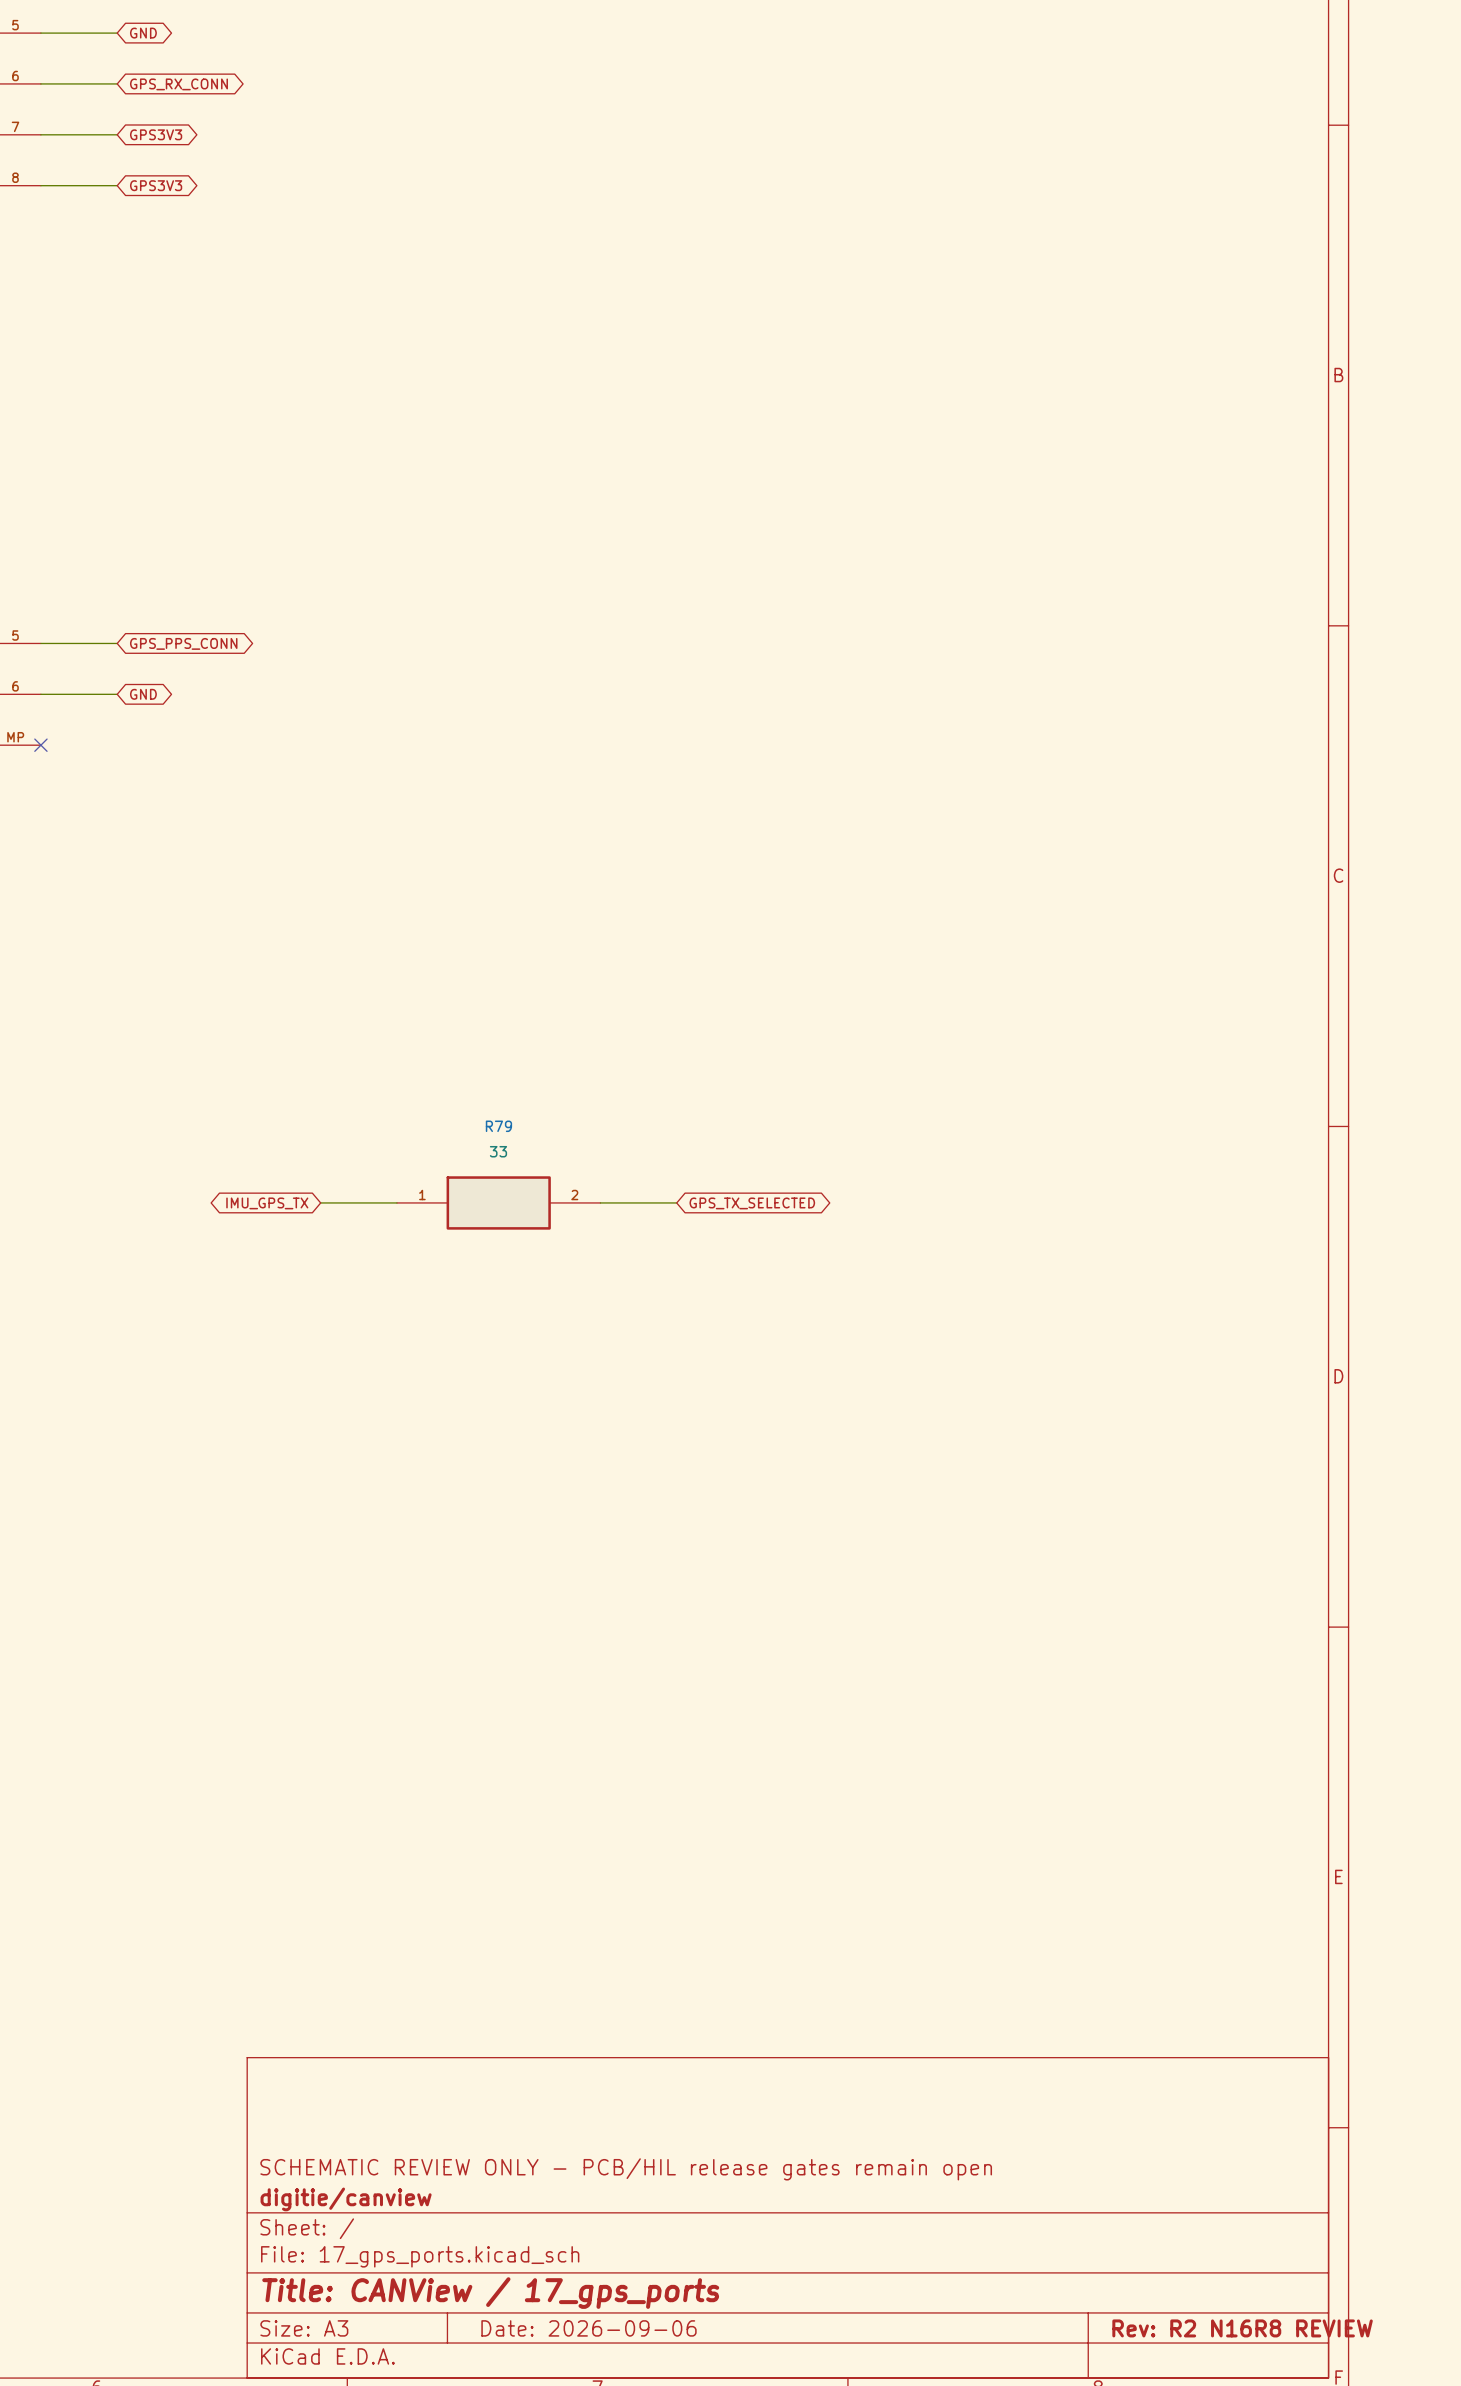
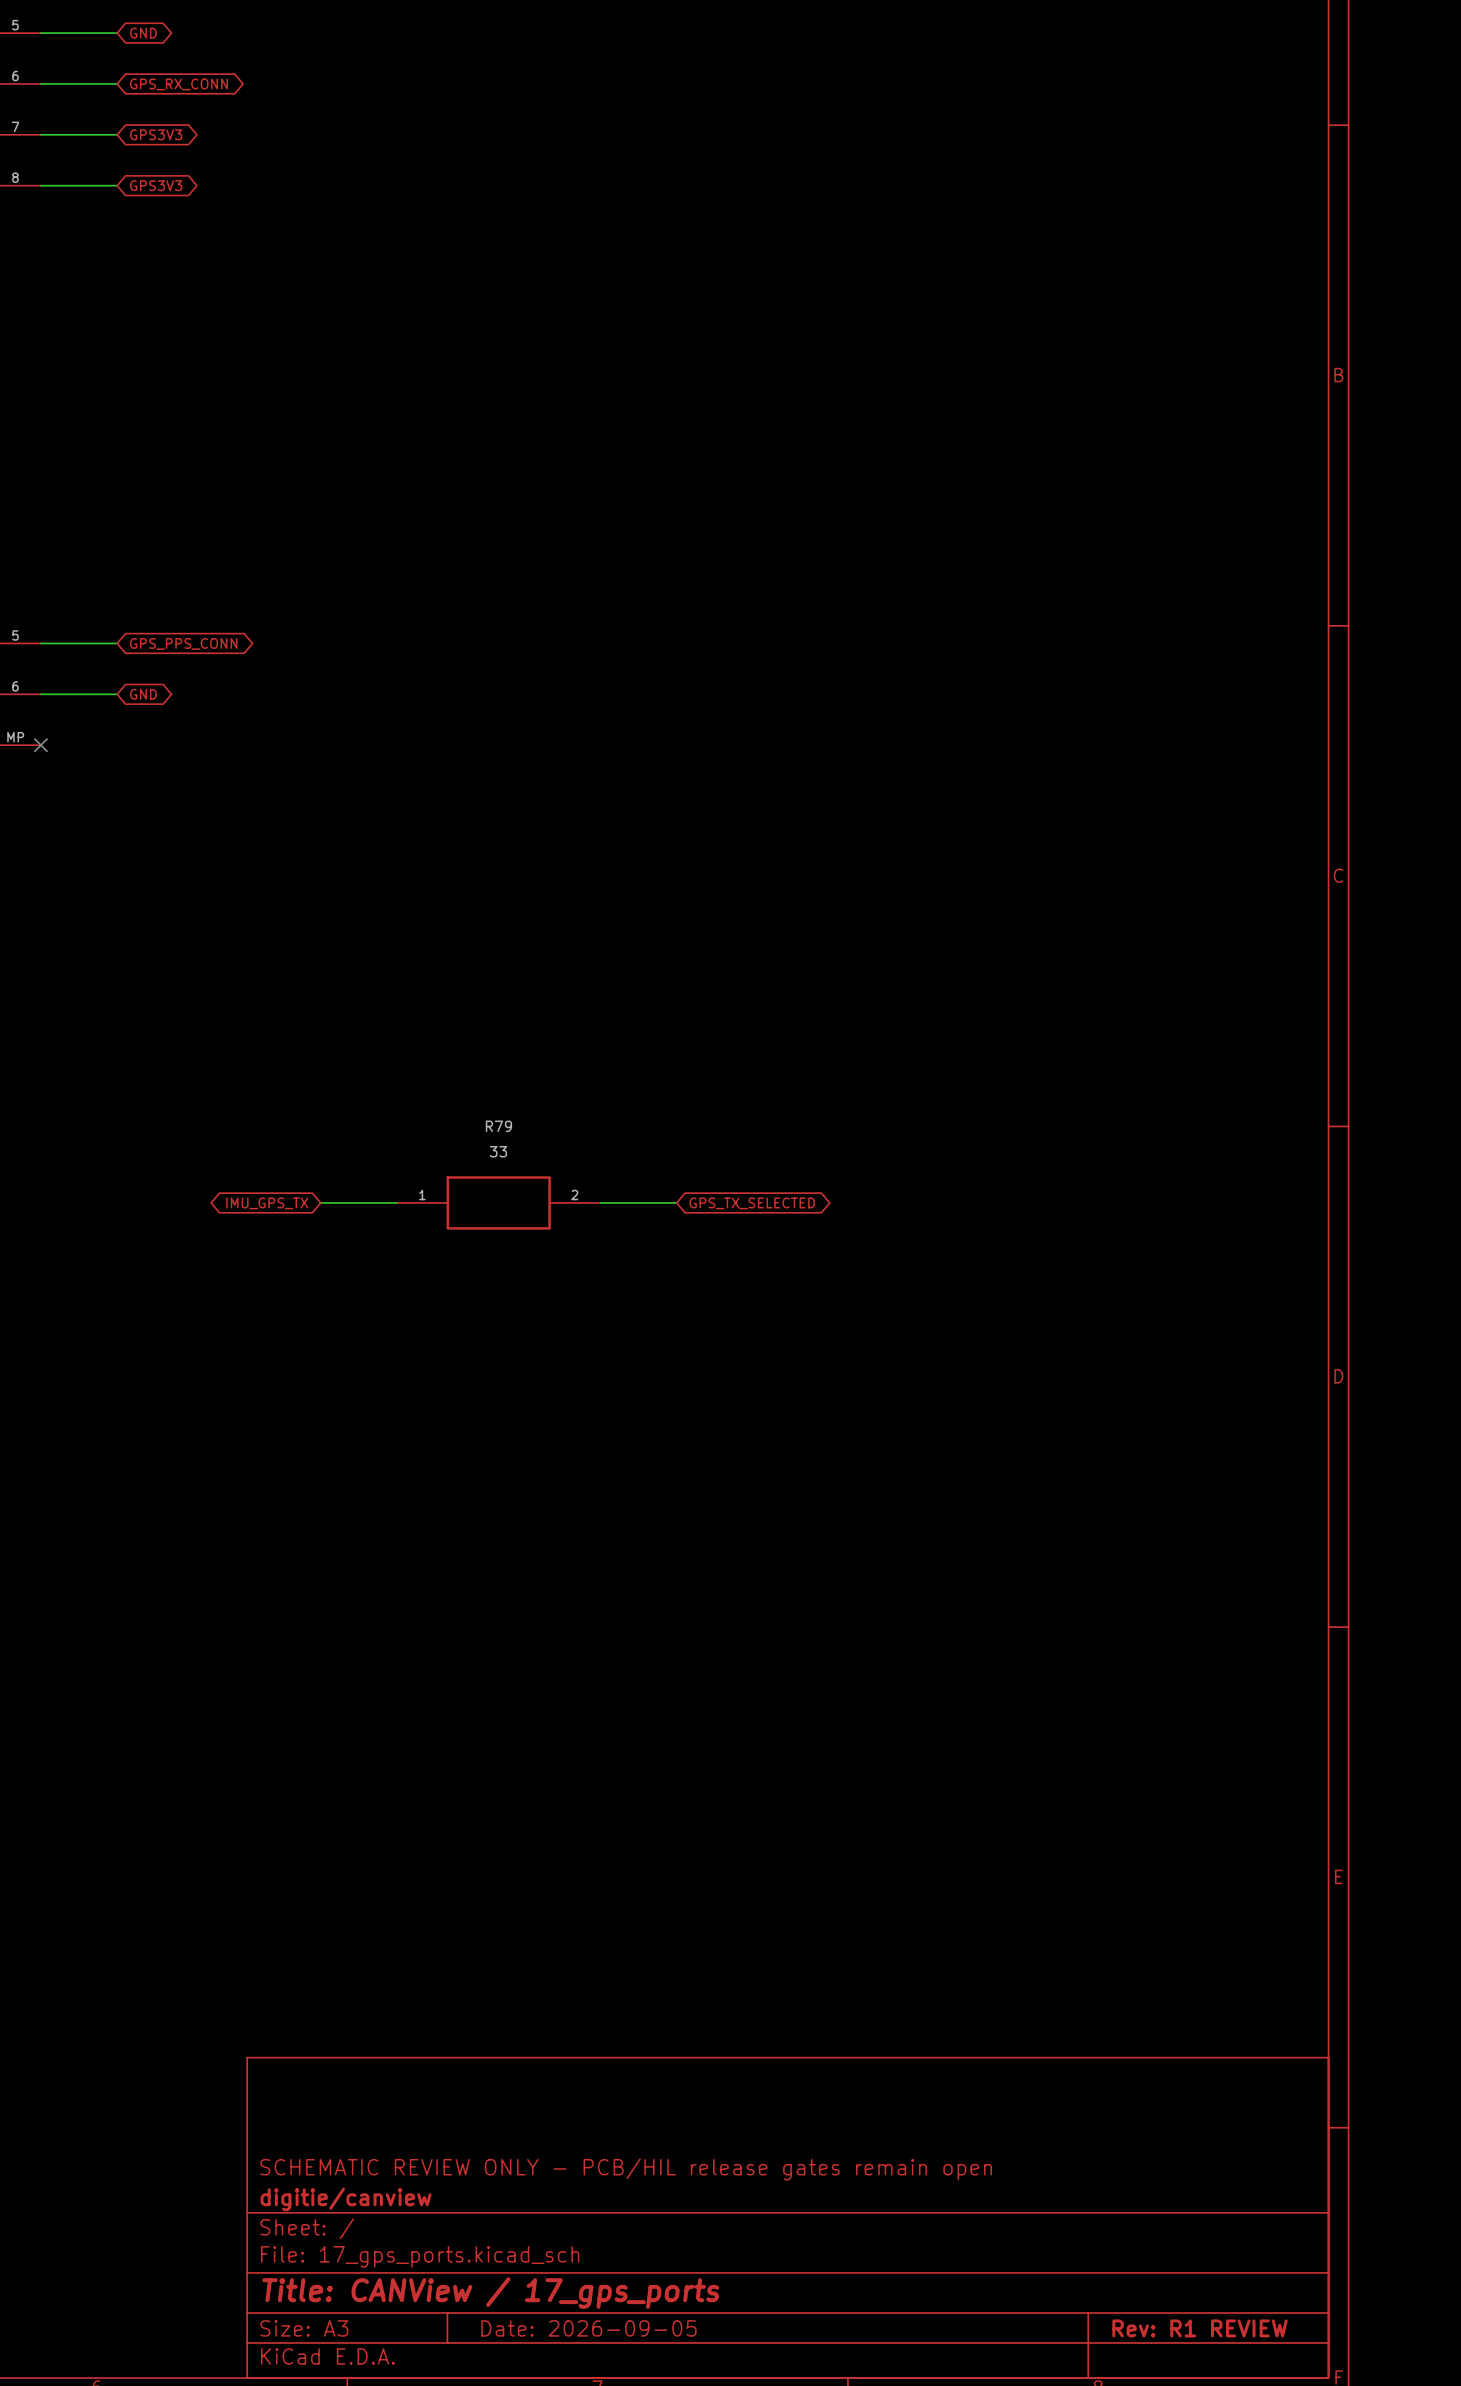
title block: Date: 2026-09-06 (588, 2328) -> Date: 2026-09-05 (588, 2328)
title block: Rev: R2 N16R8 REVIEW (1242, 2328) -> Rev: R1 REVIEW (1200, 2328)

